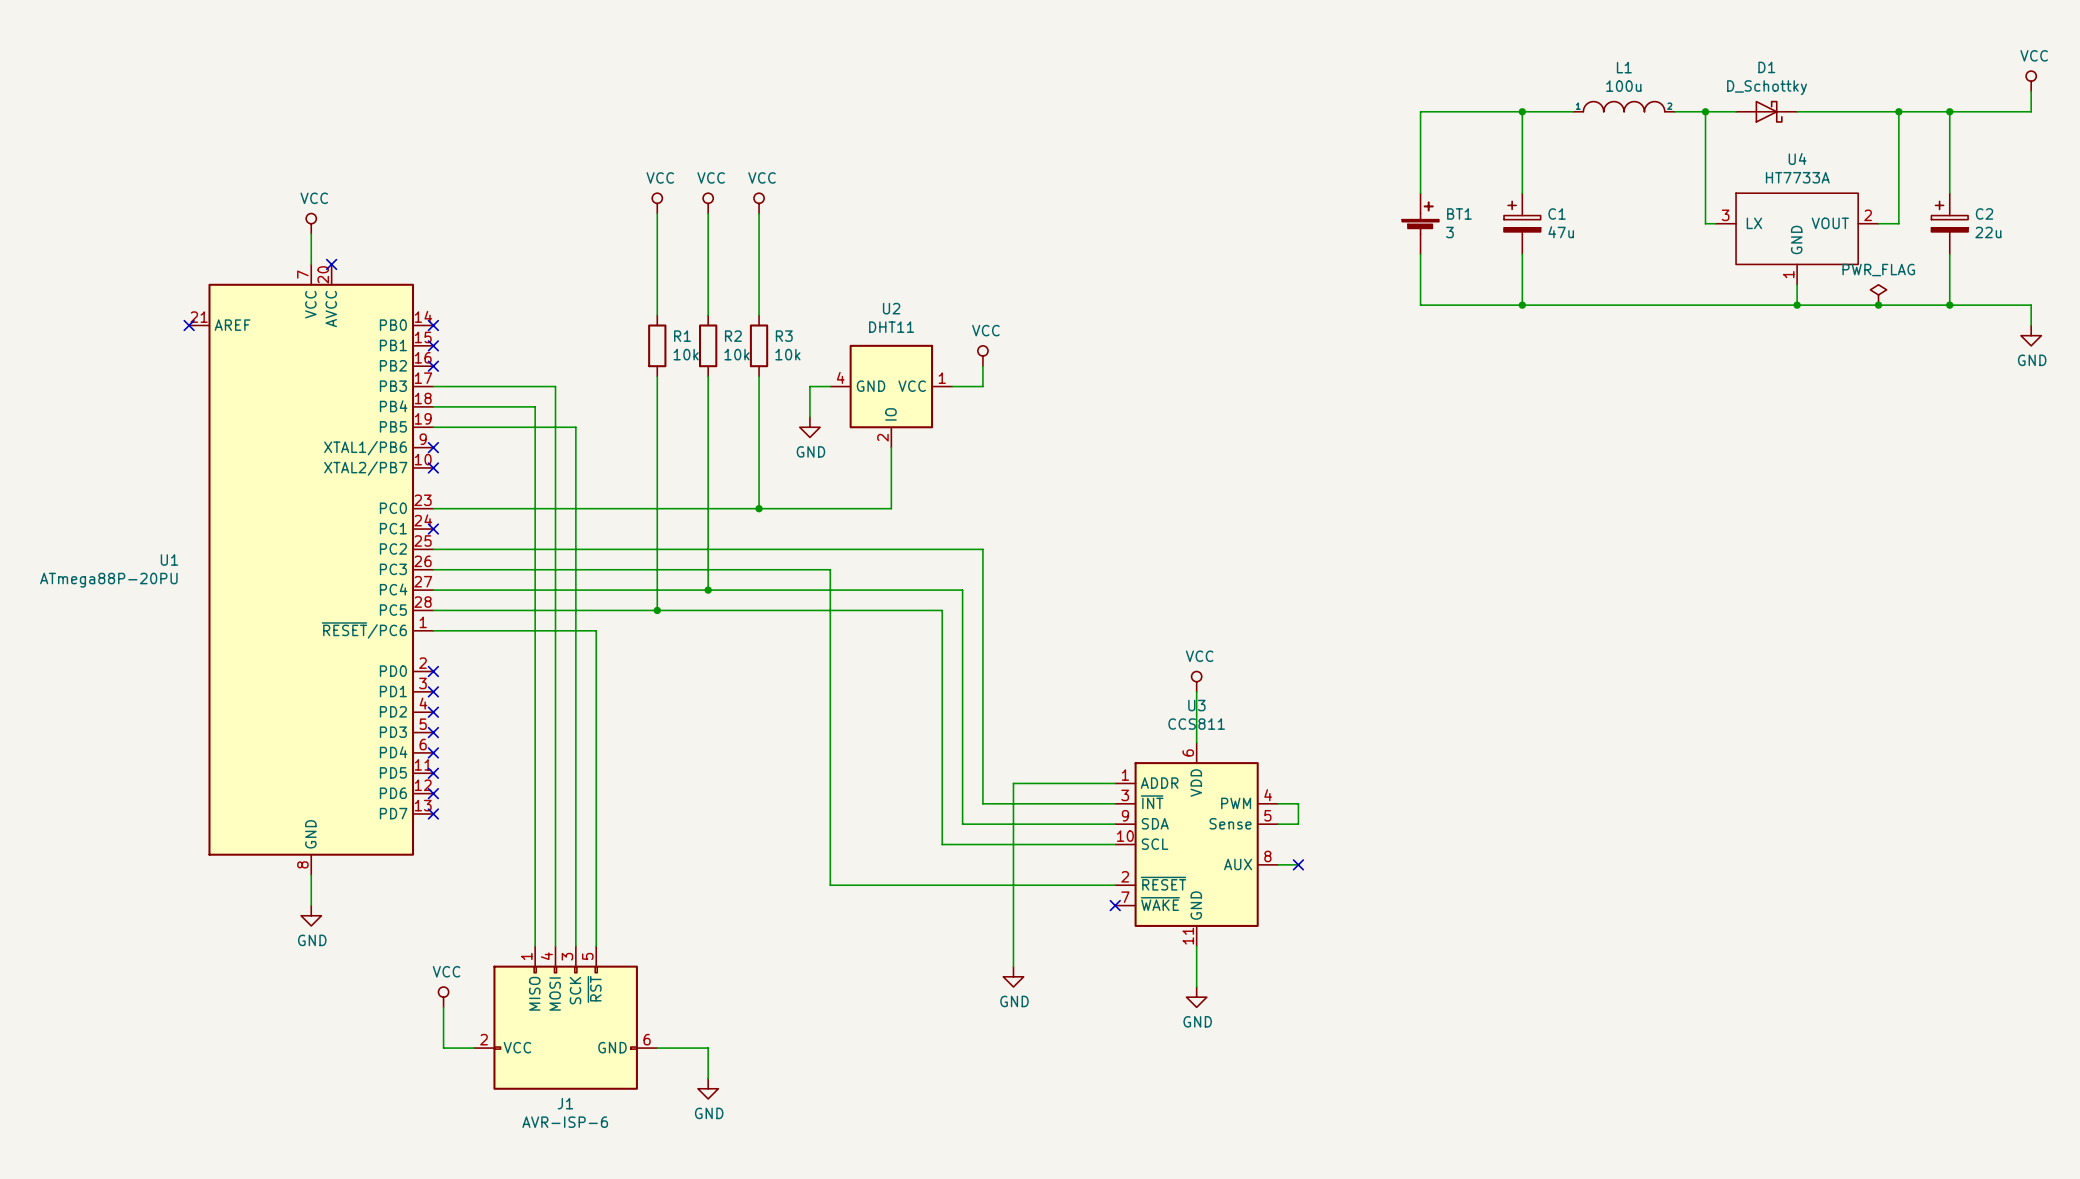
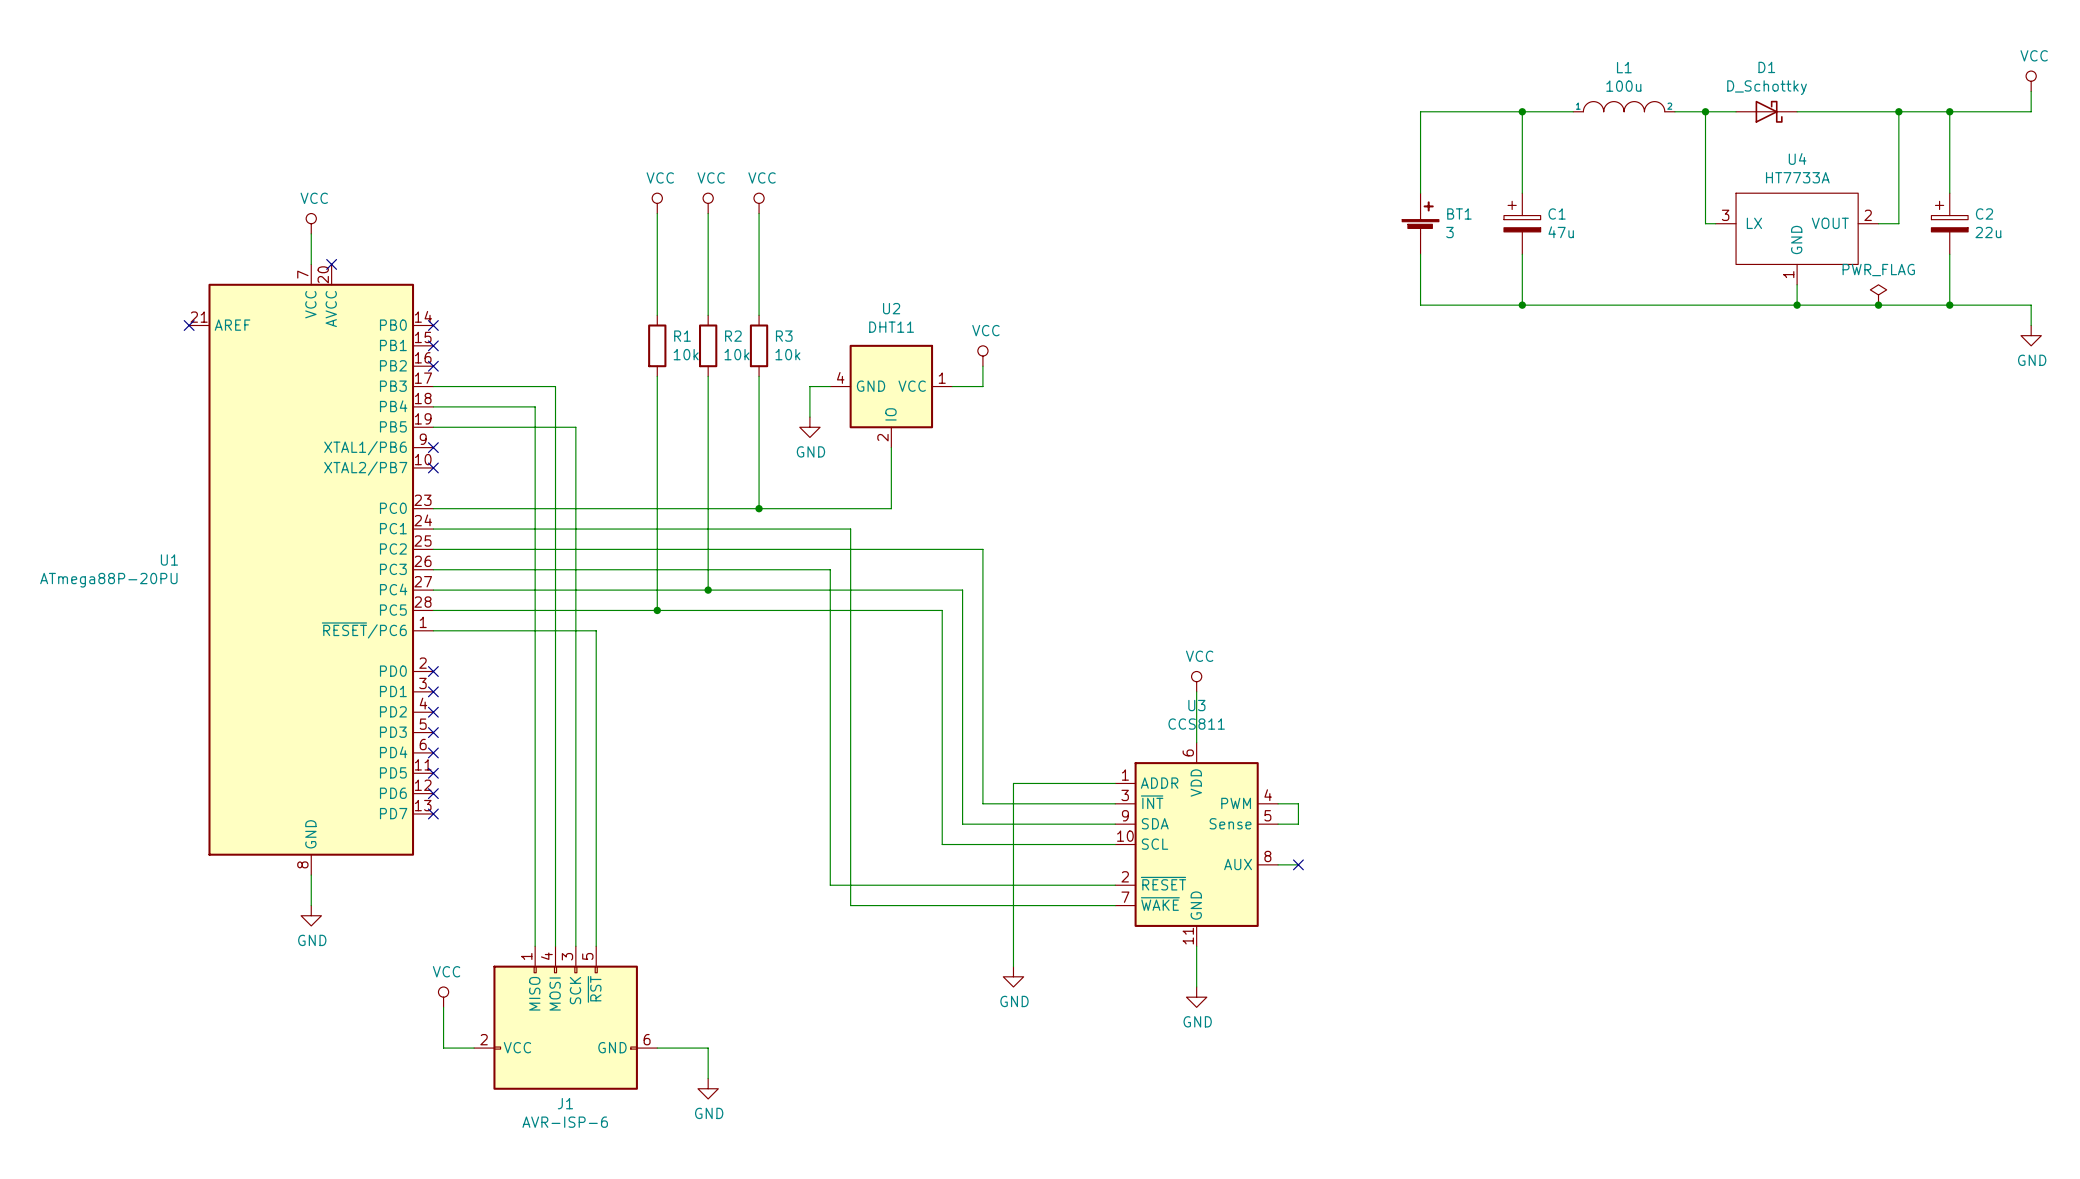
wire: none -> (433, 529) (850, 529) (850, 905) (1115, 905)
no-connect mark: (433, 529) -> none
no-connect mark: (1115, 905) -> none

